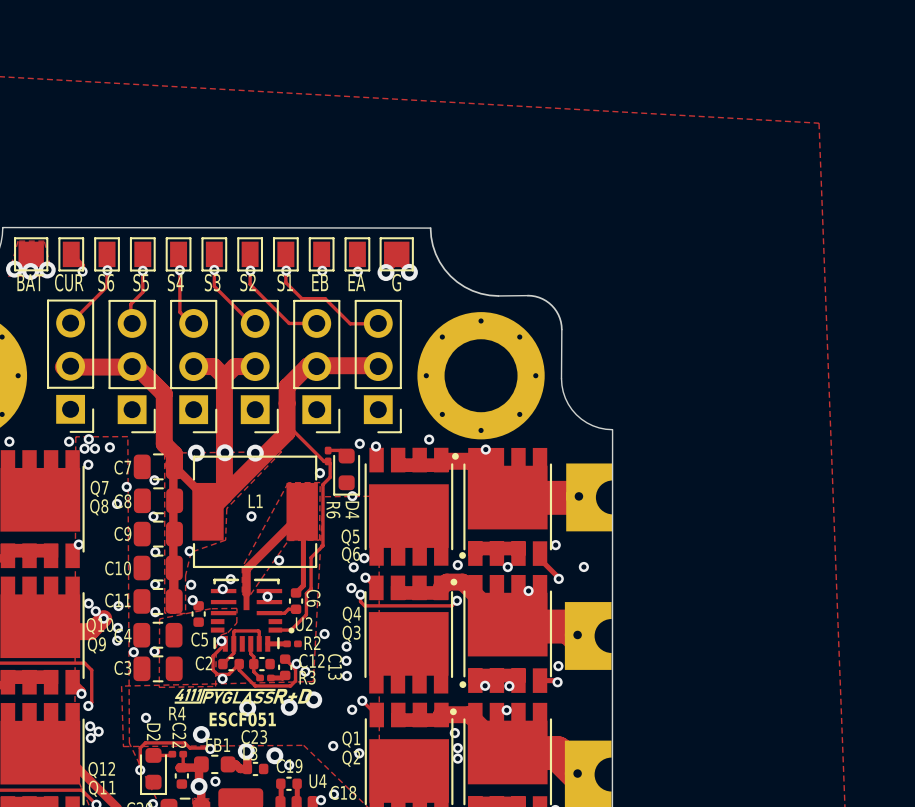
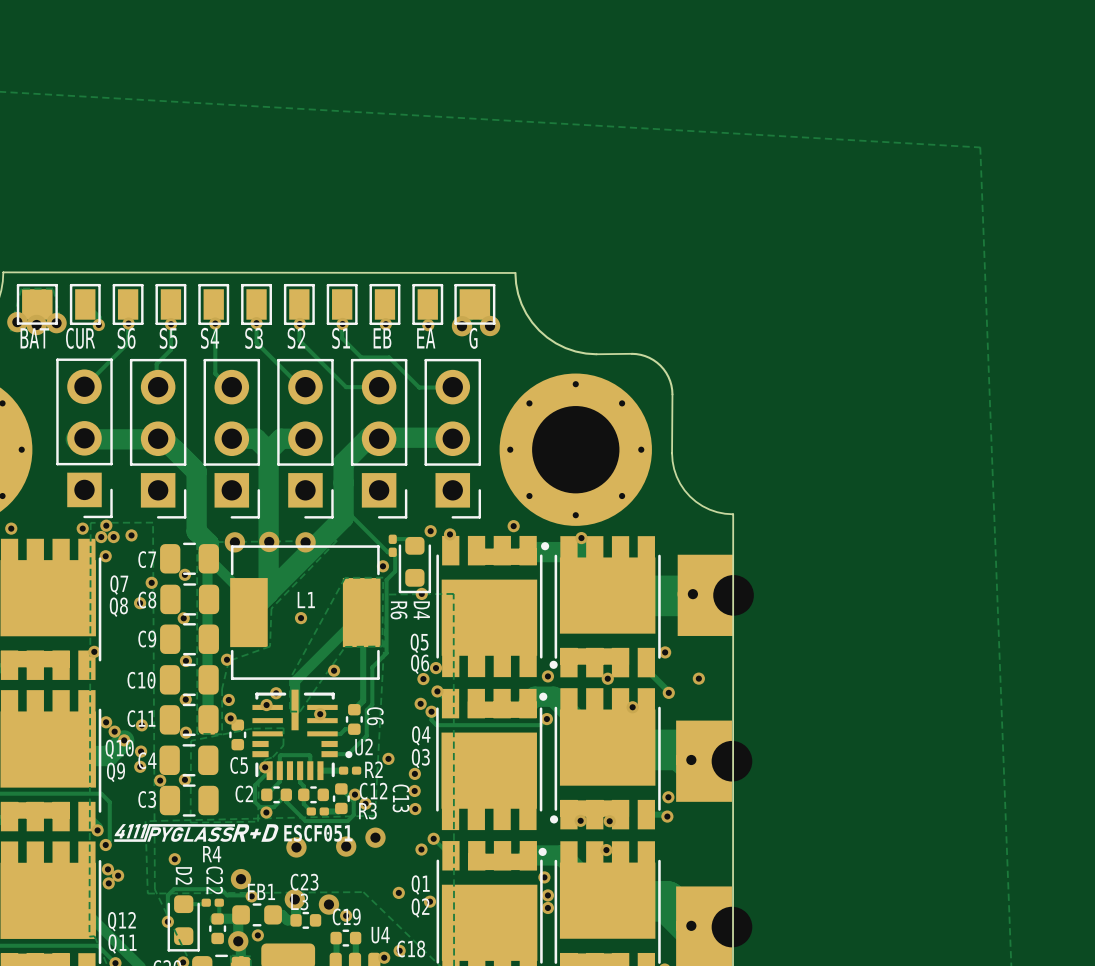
drawing position: (243, 696) -> (196, 832)
text position: ESCF051 (242, 719) -> ESCF051 (318, 833)

